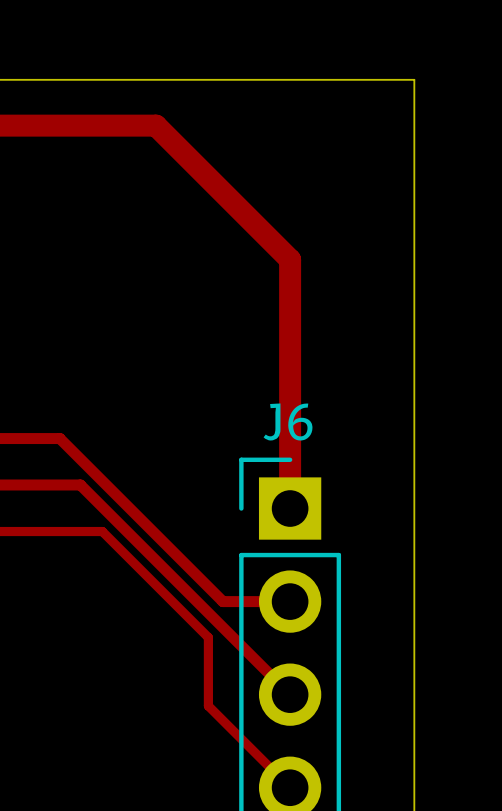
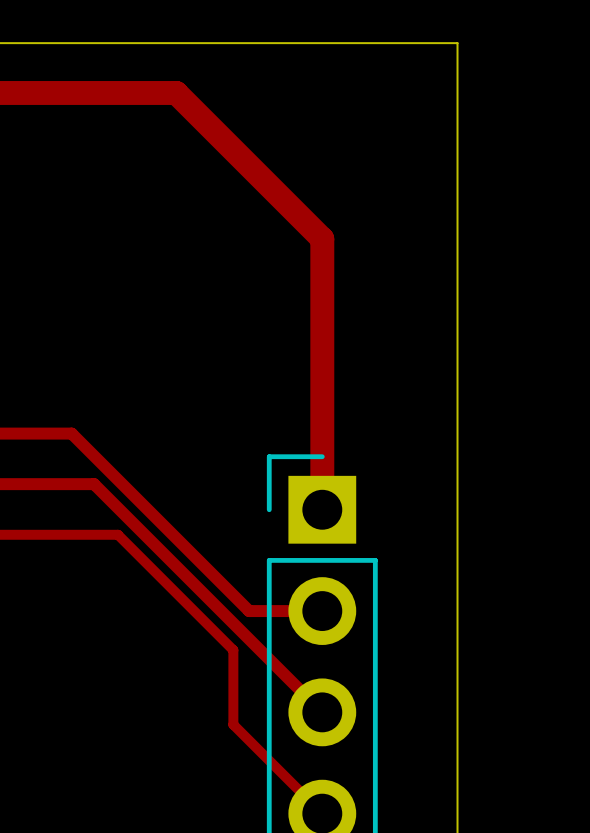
J6 name: J6 (288, 421) -> none

